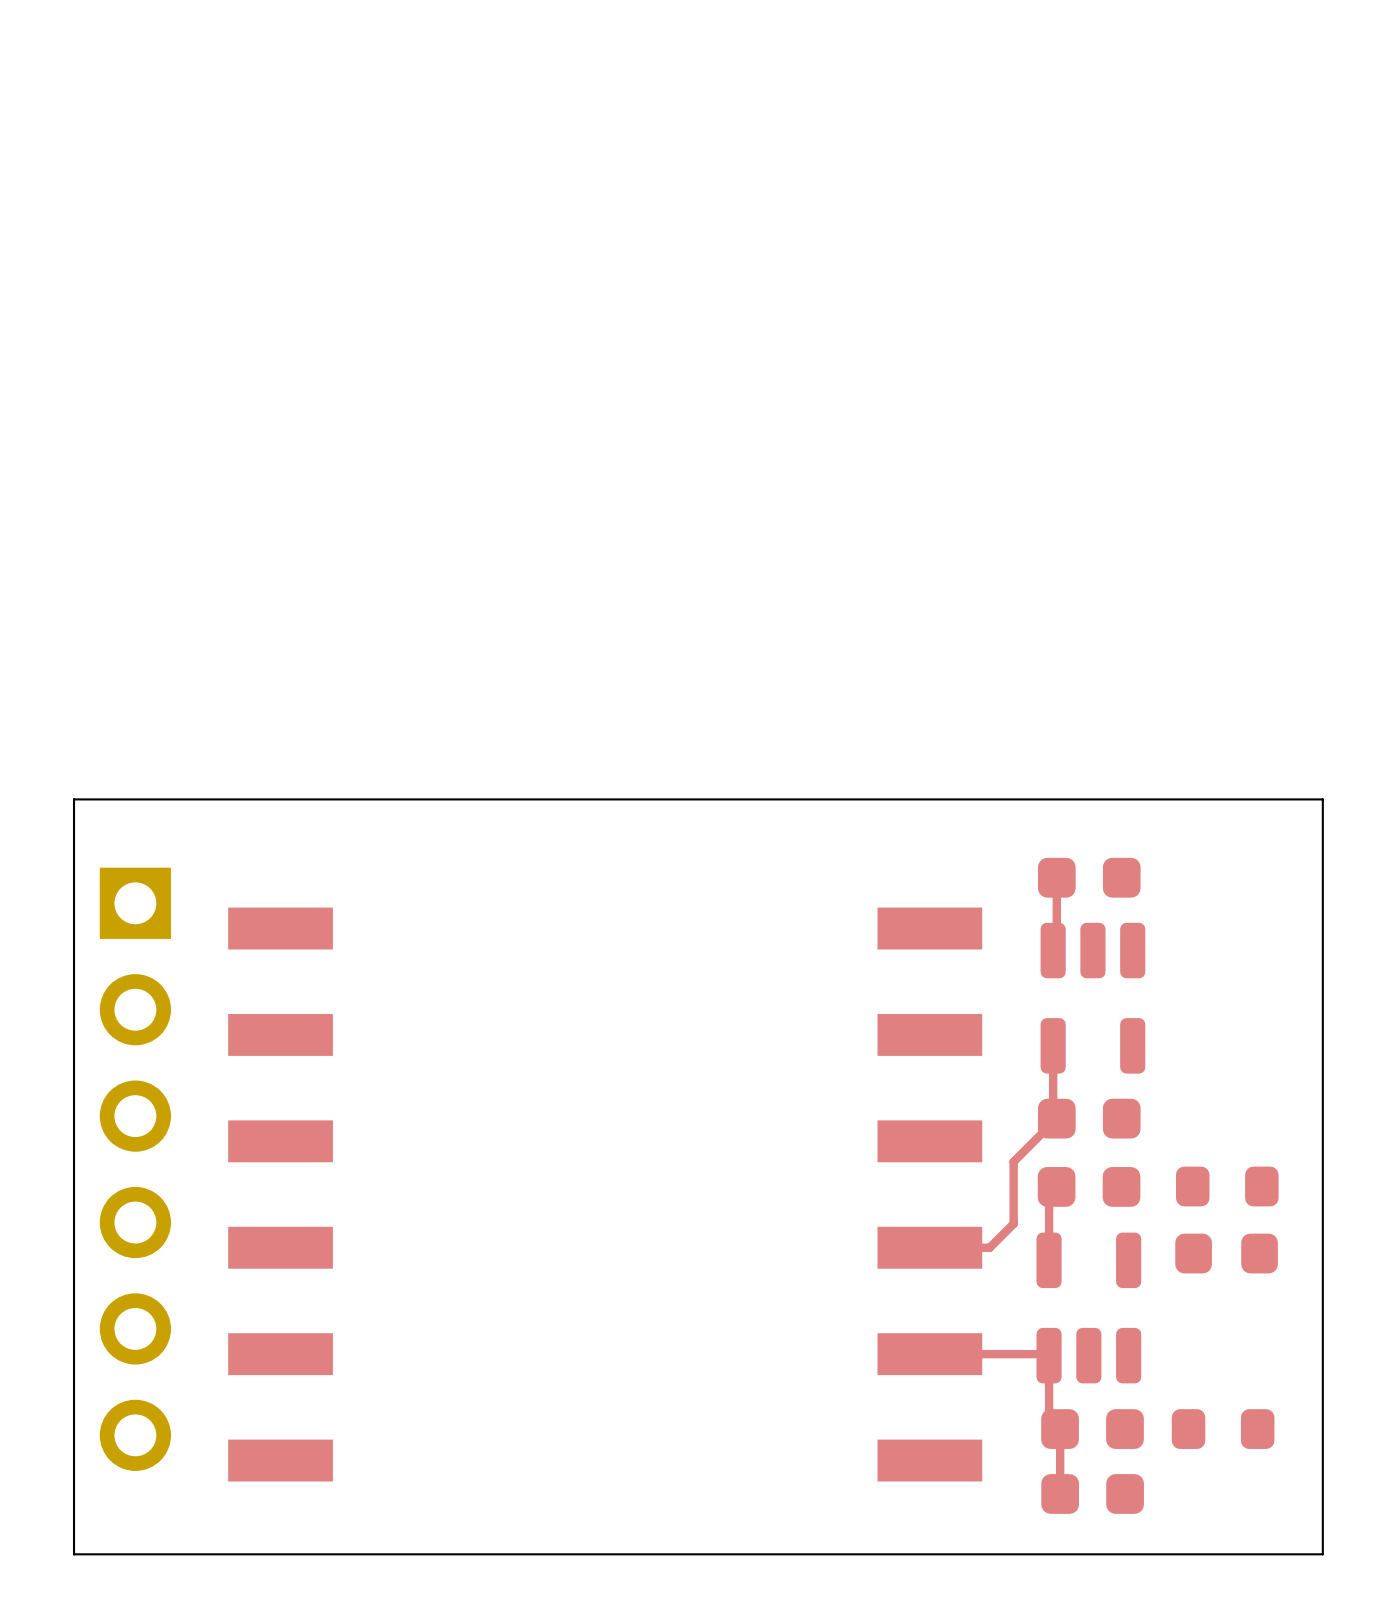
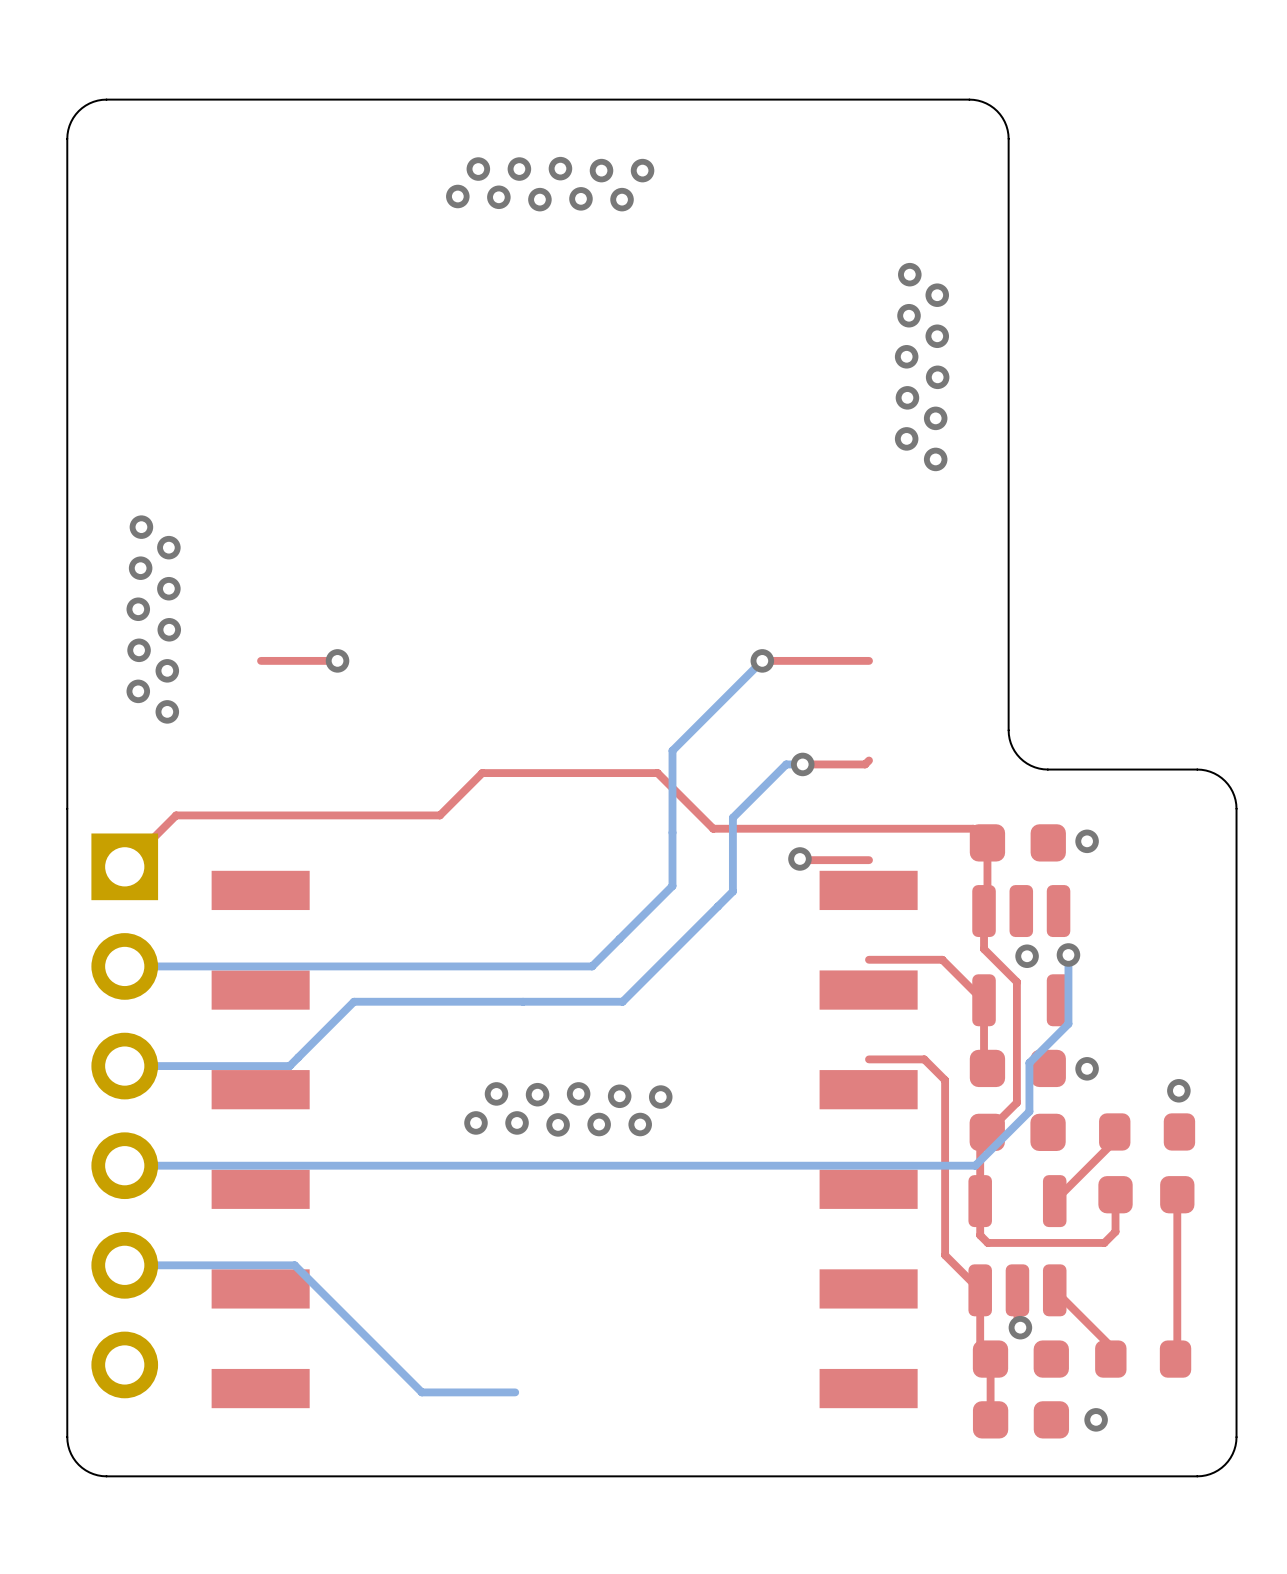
via: none -> (560, 168)
via: none -> (478, 169)
via: none -> (519, 169)
via: none -> (601, 170)
via: none -> (642, 170)
via: none -> (457, 196)
via: none -> (498, 197)
via: none -> (580, 198)
via: none -> (539, 199)
via: none -> (622, 199)
via: none -> (909, 274)
via: none -> (937, 295)
via: none -> (909, 315)
via: none -> (937, 336)
via: none -> (906, 356)
via: none -> (937, 377)
via: none -> (907, 397)
via: none -> (935, 418)
via: none -> (906, 438)
via: none -> (935, 459)
via: none -> (141, 527)
via: none -> (168, 547)
via: none -> (140, 568)
via: none -> (168, 588)
via: none -> (138, 609)
via: none -> (169, 629)
via: none -> (139, 650)
top track: none -> (337, 660) (261, 660)
via: none -> (337, 660)
bottom track: none -> (762, 660) (672, 750) (672, 886) (592, 966) (124, 966)
via: none -> (762, 660)
top track: none -> (869, 660) (762, 660)
via: none -> (167, 670)
via: none -> (138, 691)
via: none -> (167, 711)
top track: none -> (869, 760) (865, 764) (802, 764)
bottom track: none -> (802, 764) (786, 764) (732, 817) (732, 891) (622, 1001) (354, 1001) (289, 1066) (124, 1066)
via: none -> (802, 764)
board edge: (1121, 799) (74, 799) -> (1047, 769) (1030, 765) (1020, 758) (1012, 747) (1008, 734) (1008, 134) (1004, 121) (993, 108) (982, 101) (969, 99) (106, 99) (93, 101) (82, 108) (71, 121) (67, 138) (67, 769)
board edge: (1280, 799) (1322, 799) (1322, 841) -> (1197, 769) (1214, 773) (1225, 781) (1232, 791) (1236, 808)
via: none -> (1087, 841)
top track: none -> (987, 842) (973, 828) (713, 828) (657, 773) (482, 773) (439, 815) (176, 815) (124, 866)
top track: none -> (799, 858) (869, 860)
via: none -> (799, 858)
top track: none -> (984, 911) (984, 949) (1016, 981) (1016, 1102) (987, 1132)
bottom track: none -> (1068, 954) (1068, 1023) (1029, 1062) (1029, 1111) (975, 1165) (124, 1165)
via: none -> (1068, 954)
via: none -> (1027, 956)
top track: none -> (869, 959) (942, 959) (984, 1000)
top track: (1056, 1118) (1013, 1161) (1013, 1223) (989, 1247) (929, 1247) -> none
via: none -> (1087, 1068)
via: none -> (1178, 1090)
via: none -> (496, 1093)
via: none -> (578, 1093)
via: none -> (537, 1094)
via: none -> (619, 1096)
via: none -> (660, 1097)
via: none -> (475, 1122)
via: none -> (517, 1122)
via: none -> (558, 1124)
via: none -> (599, 1124)
via: none -> (640, 1124)
top track: none -> (1114, 1131) (1114, 1141) (1054, 1201)
top track: none -> (1115, 1194) (1115, 1231) (1104, 1242) (987, 1242) (980, 1235) (980, 1201)
top track: none -> (1177, 1194) (1177, 1357) (1175, 1359)
bottom track: none -> (124, 1265) (294, 1265) (421, 1392) (515, 1392)
top track: (1047, 1354) (929, 1354) -> (978, 1288) (945, 1255) (945, 1080) (924, 1059) (869, 1059)
top track: none -> (1054, 1290) (1110, 1346) (1110, 1359)
via: none -> (1020, 1327)
via: none -> (1096, 1419)
board edge: (74, 1512) (74, 1554) (115, 1554) -> (67, 1437) (71, 1454) (78, 1464) (89, 1472) (106, 1476)
board edge: (1322, 1512) (1322, 1554) (1280, 1554) -> (1236, 1437) (1232, 1454) (1225, 1464) (1210, 1474) (1197, 1476)

